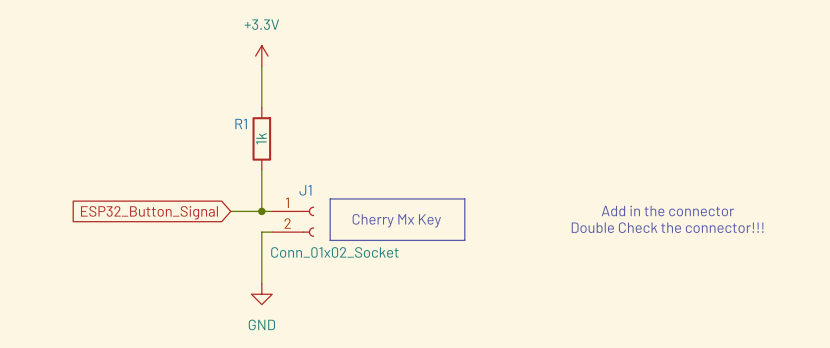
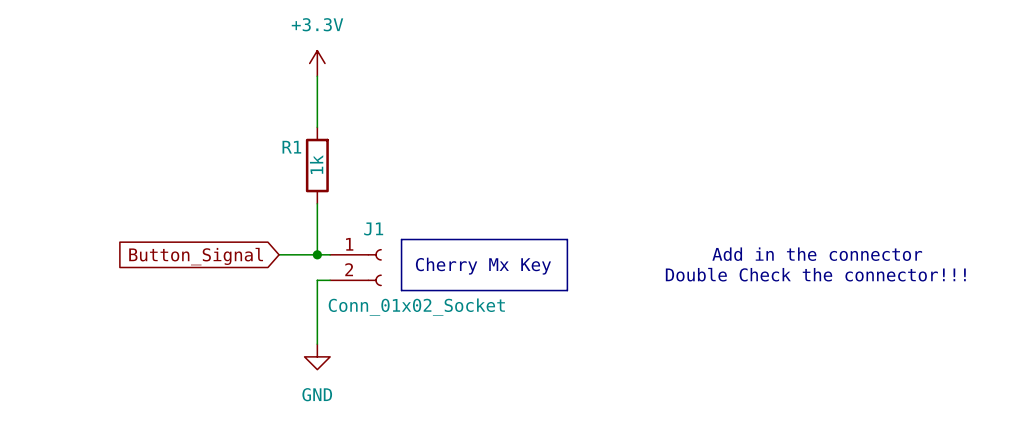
global label: ESP32_Button_Signal (149, 212) -> Button_Signal (196, 256)

